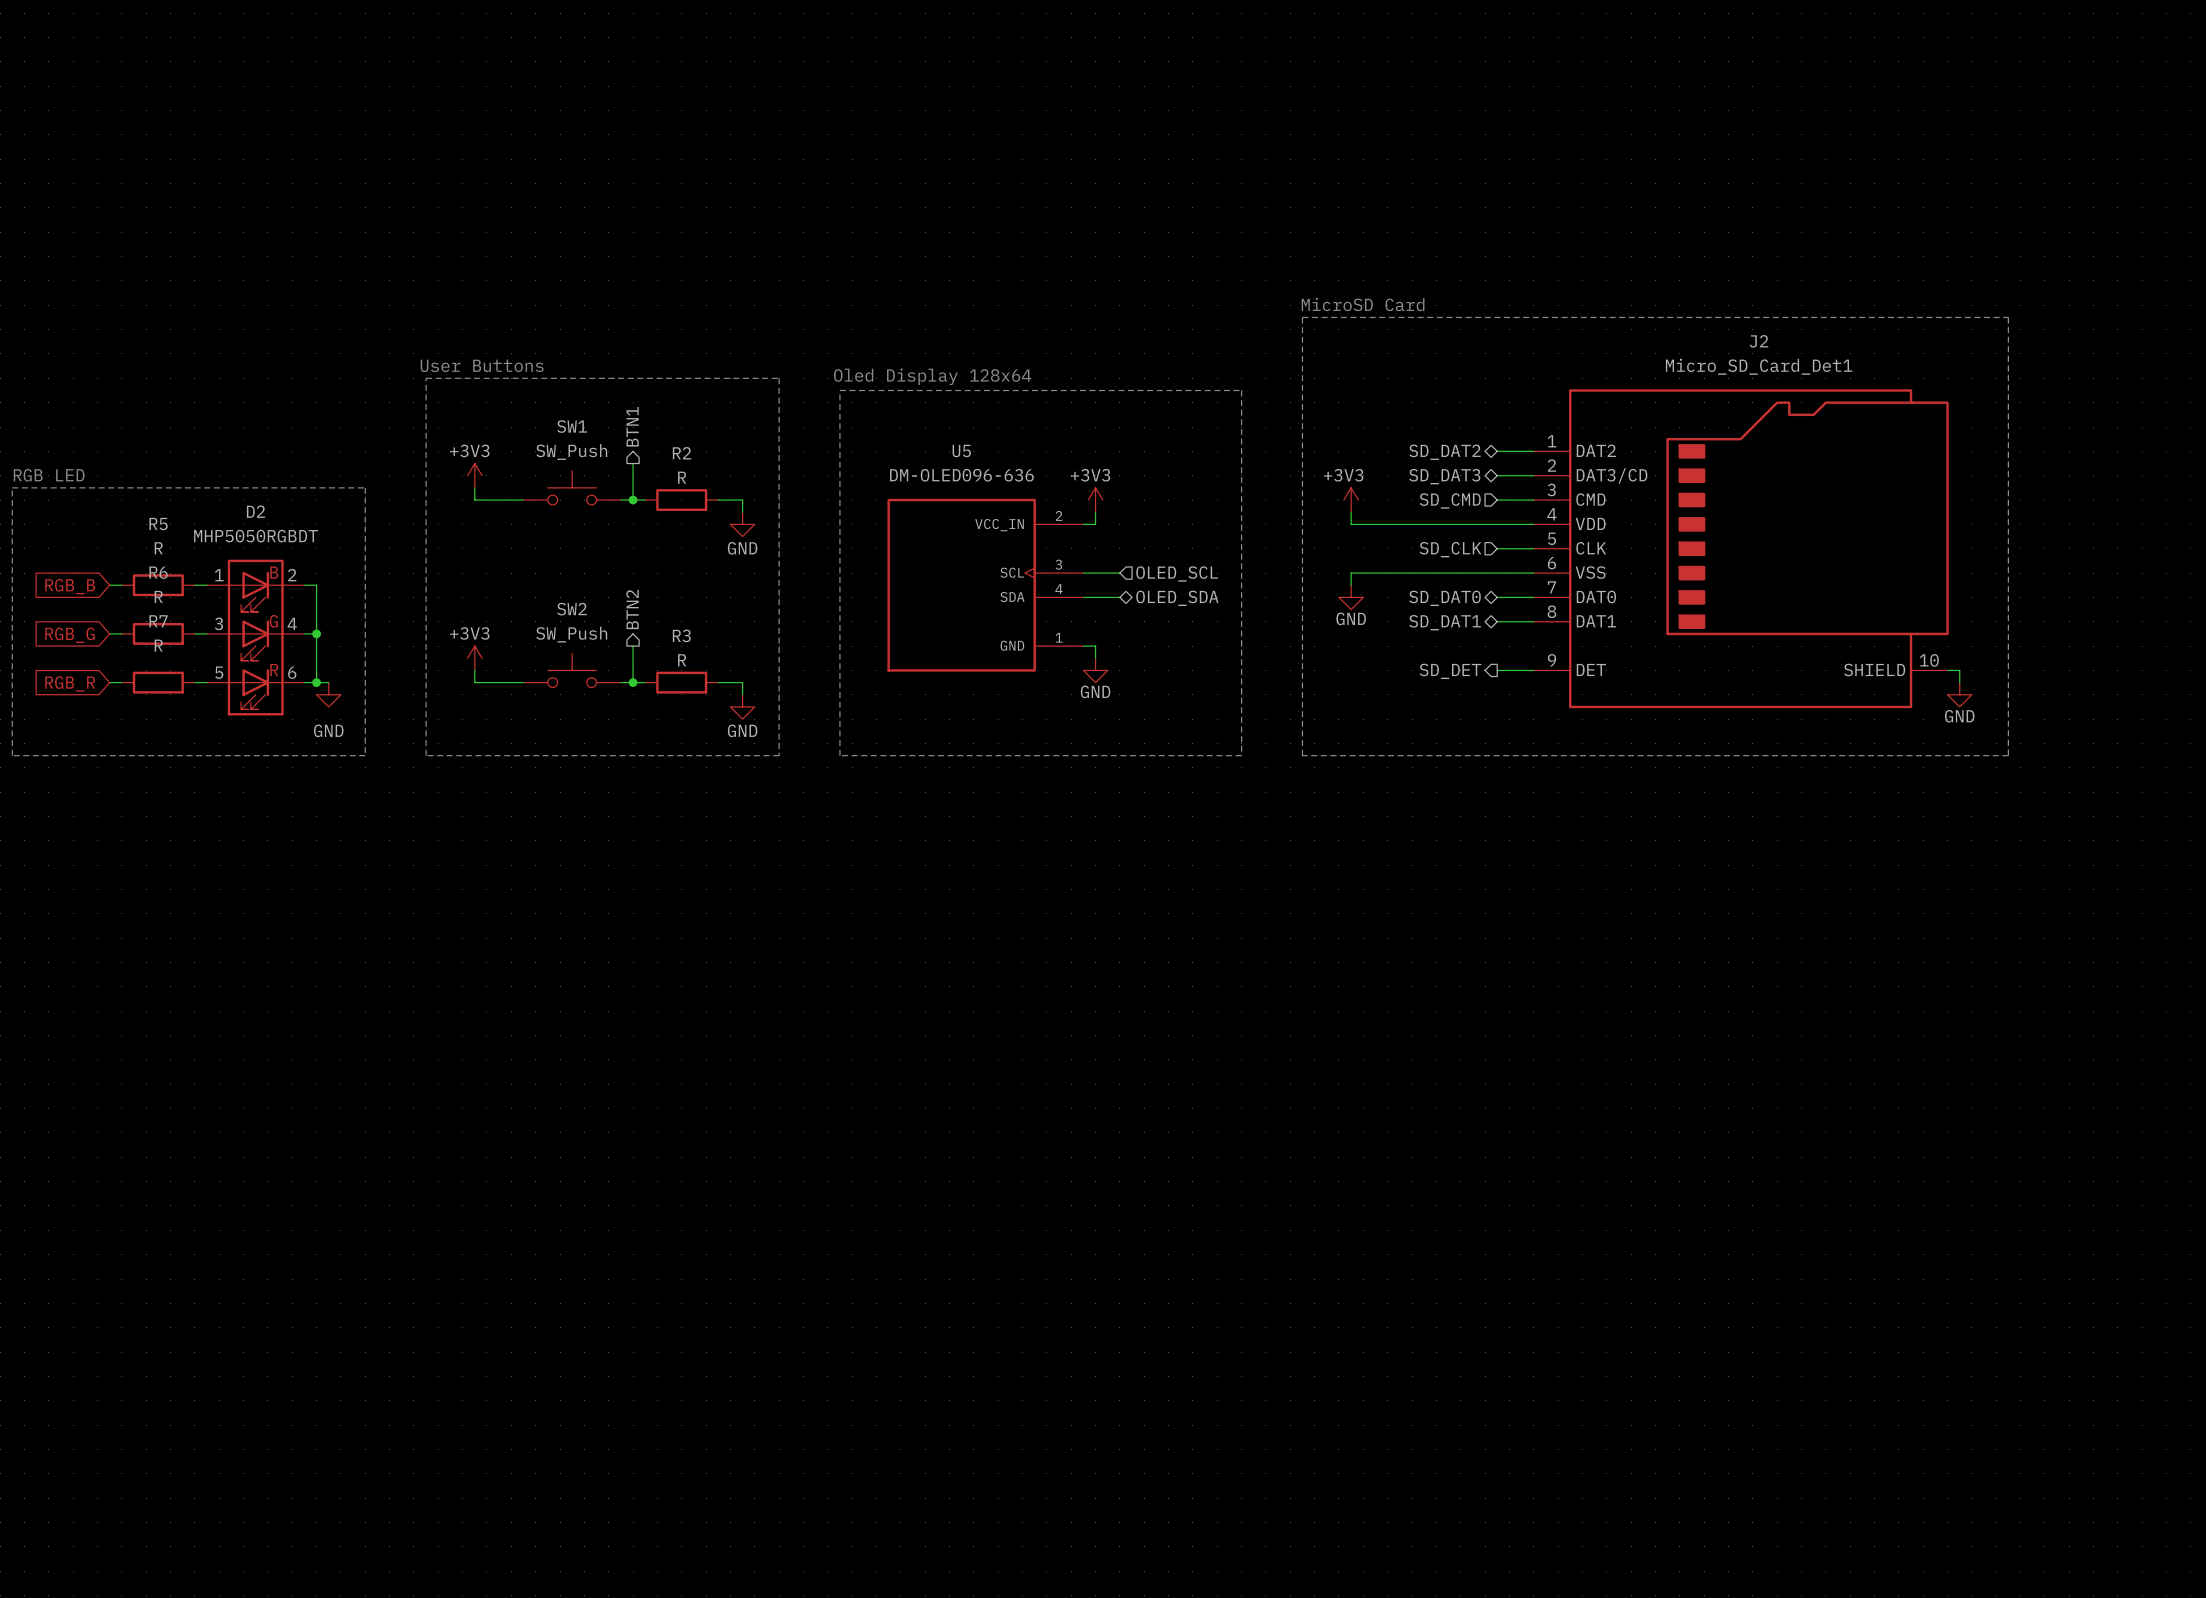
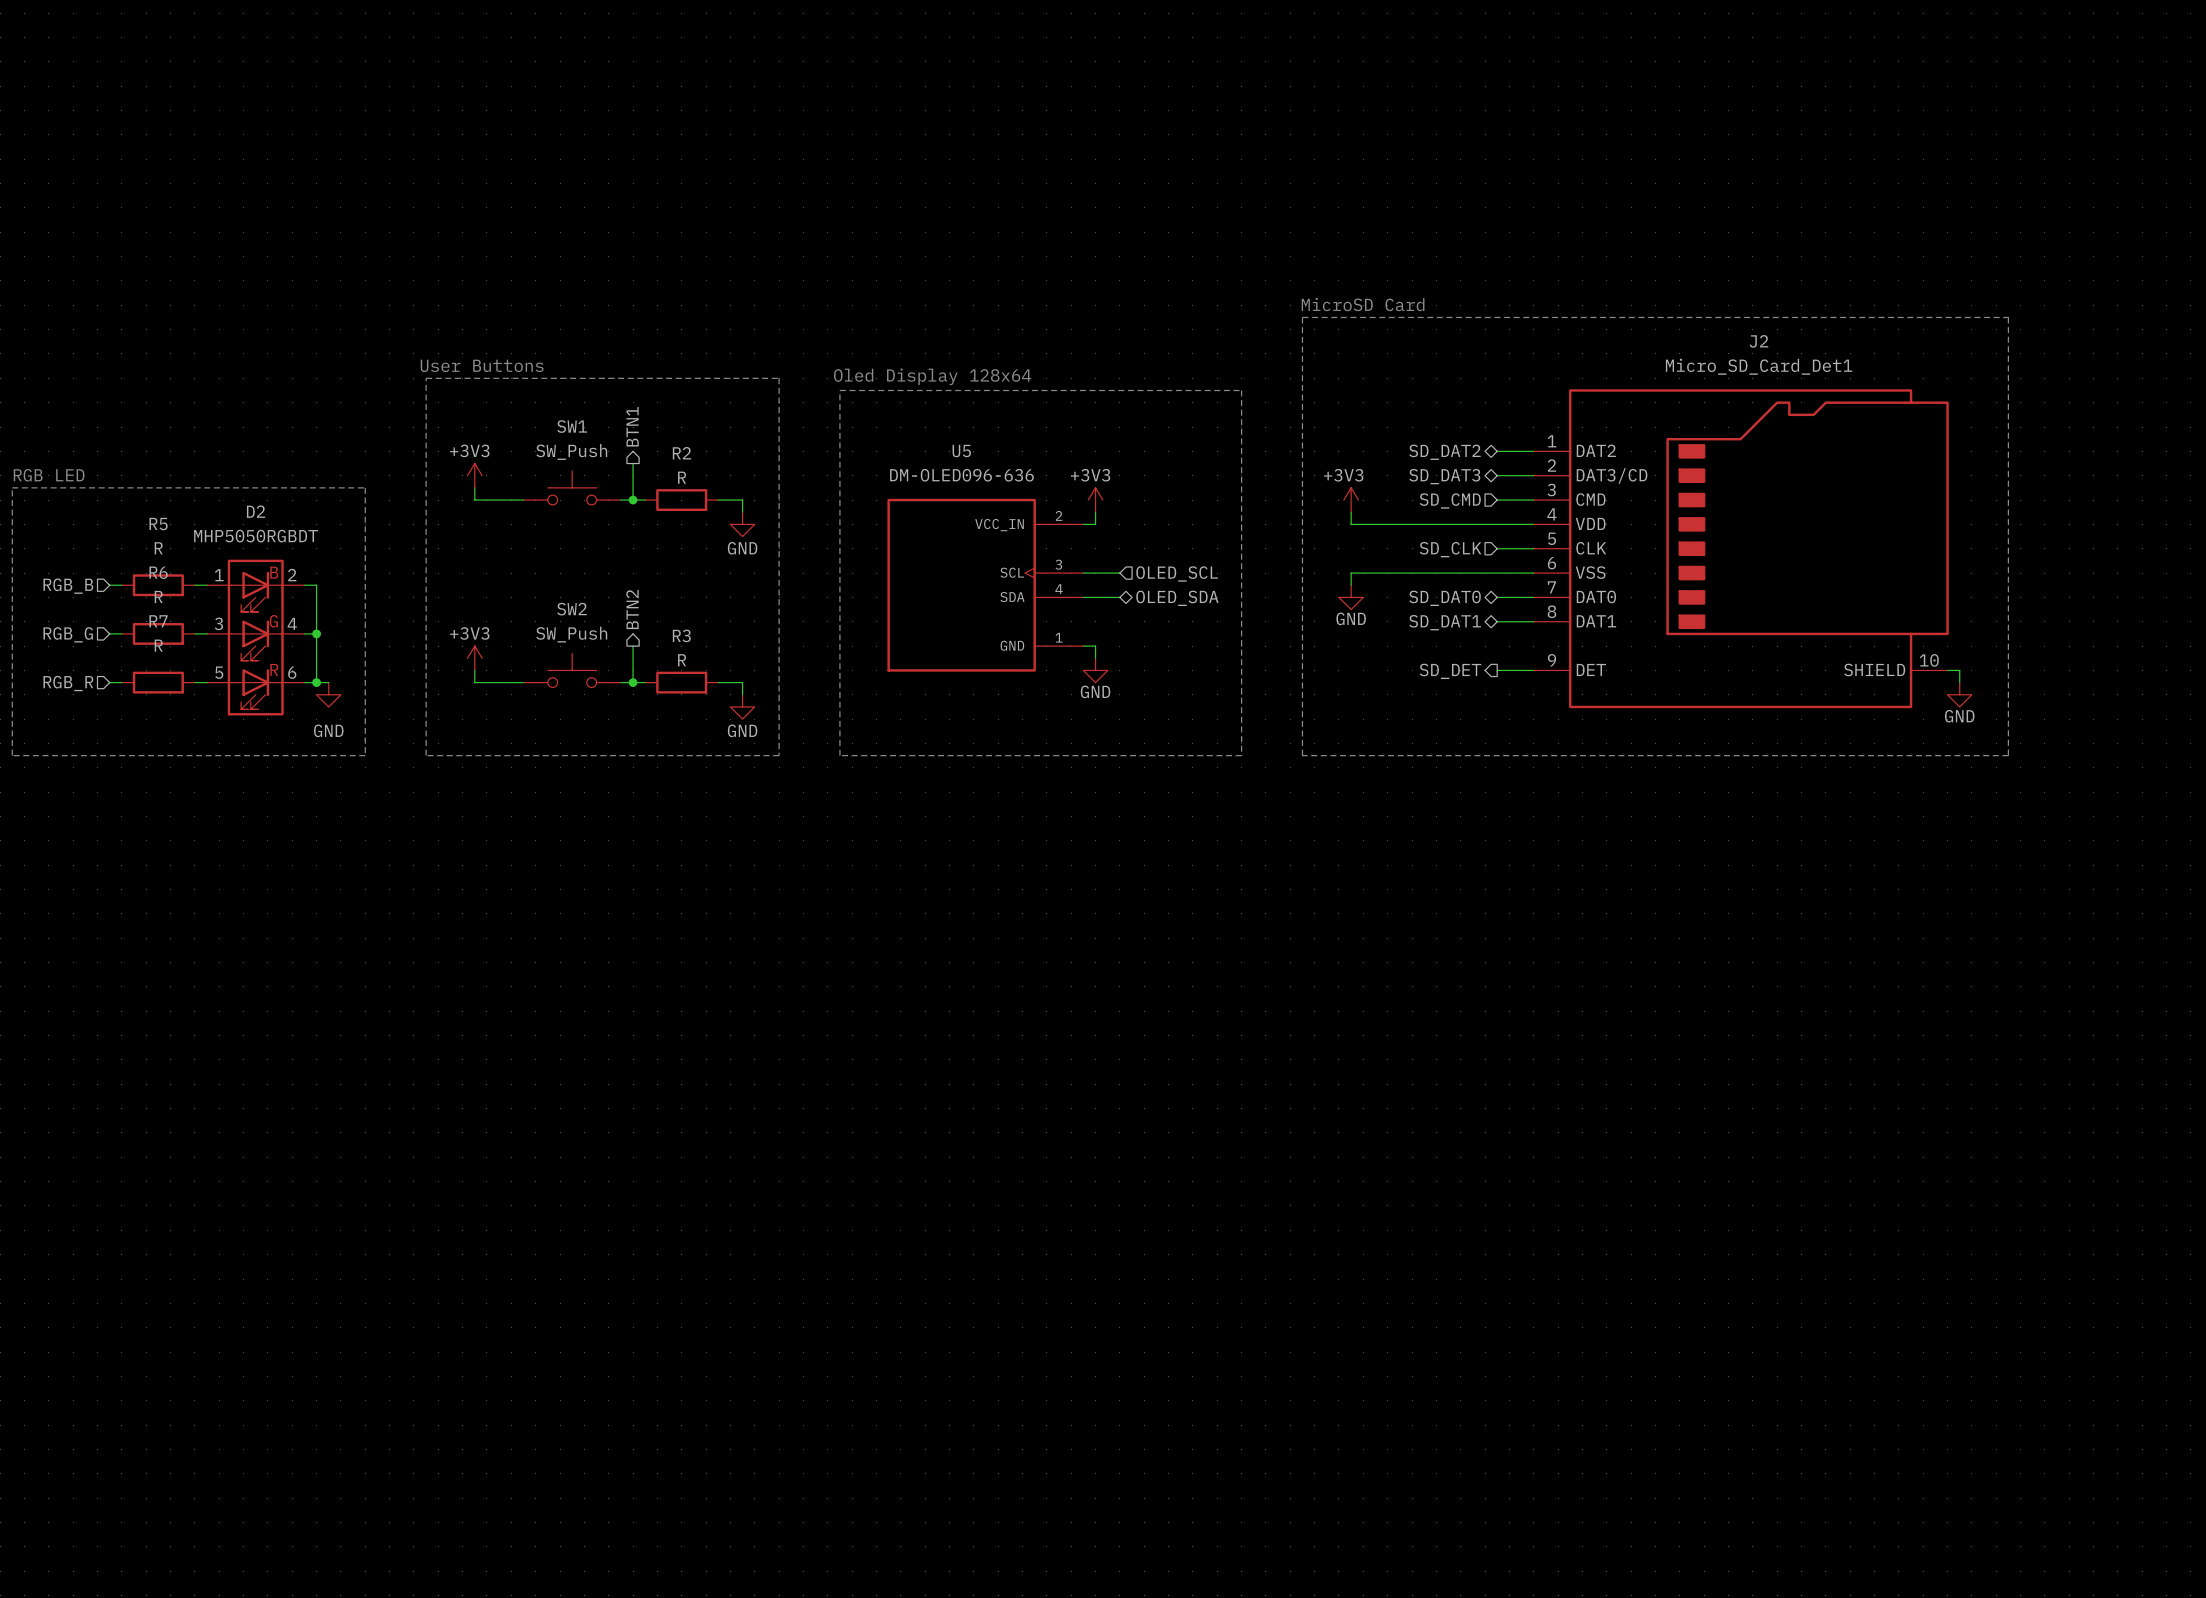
hierarchical label: none -> RGB_B (68, 586)
global label: RGB_B (70, 586) -> none
hierarchical label: none -> RGB_G (68, 634)
global label: RGB_G (69, 635) -> none
hierarchical label: none -> RGB_R (68, 683)
global label: RGB_R (70, 683) -> none

